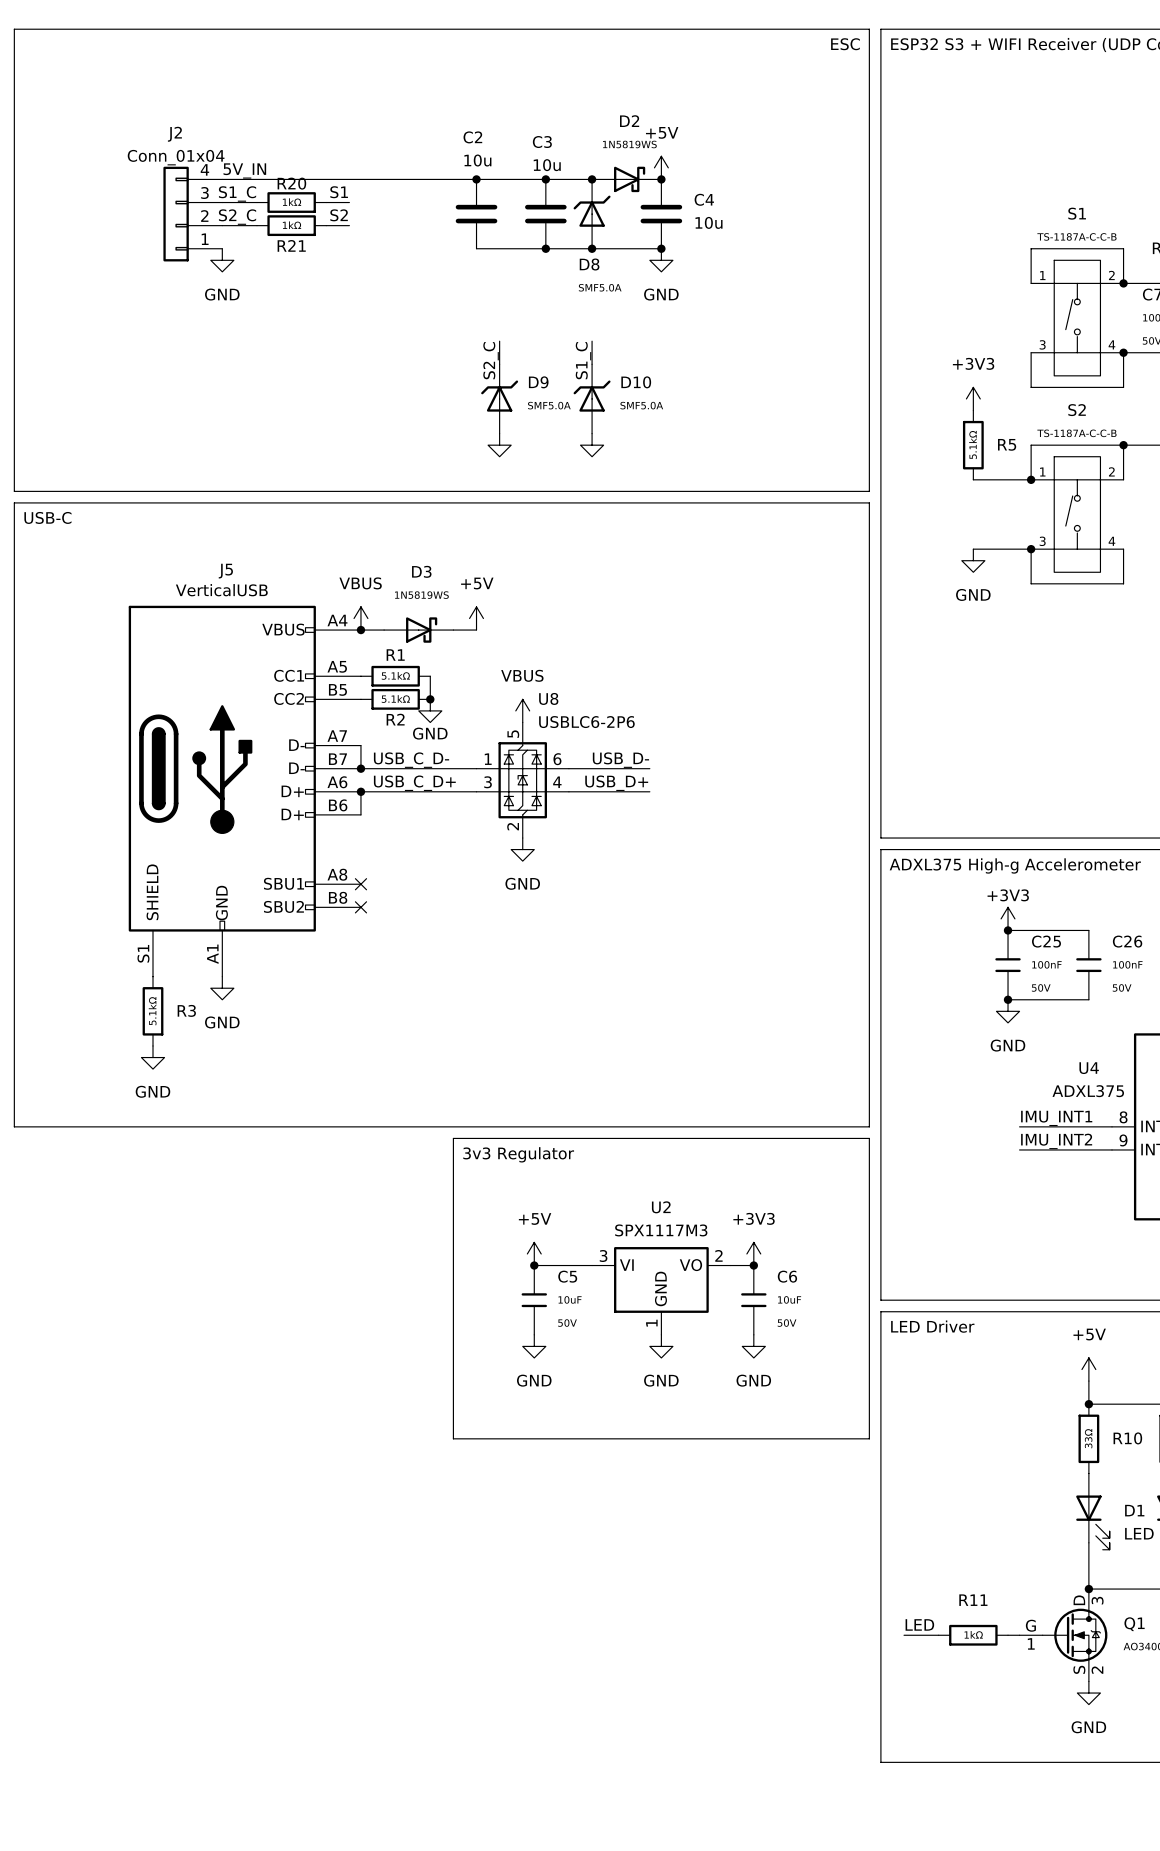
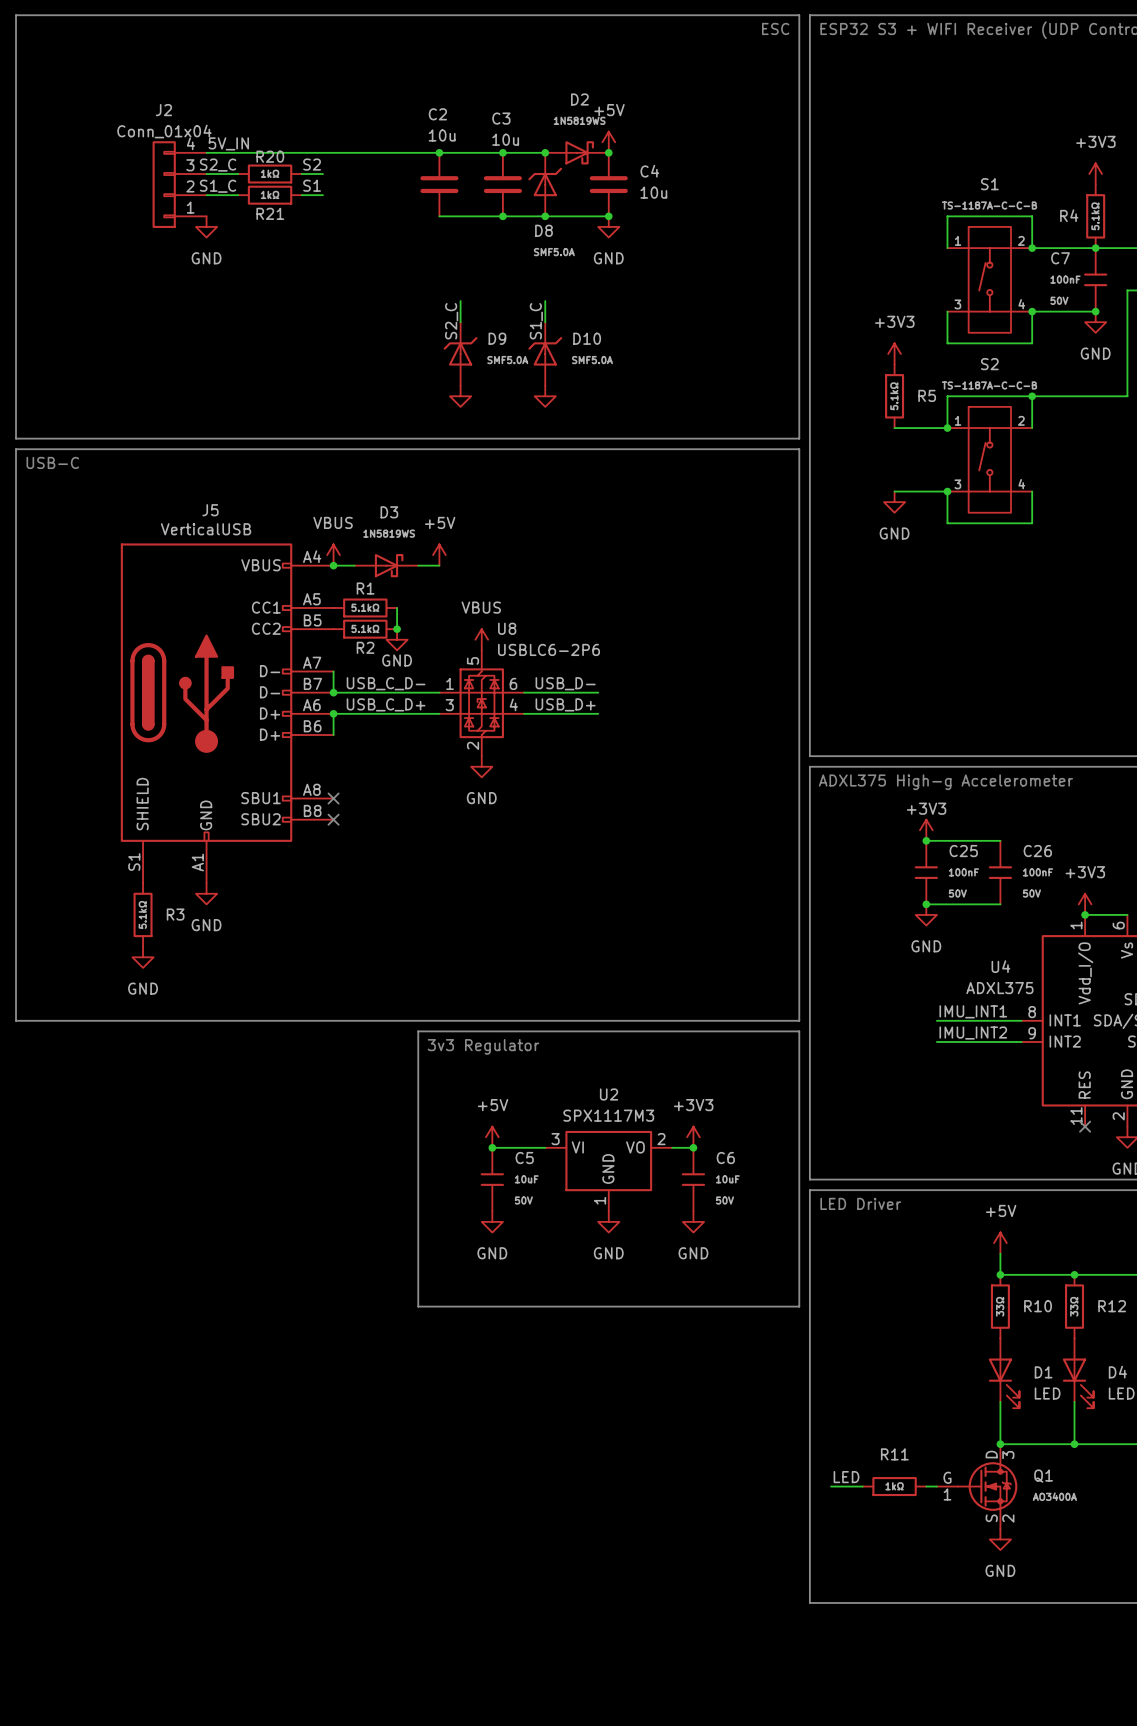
label: S1 (339, 192) -> S2 (312, 164)
label: S1_C (237, 193) -> S2_C (218, 165)
label: S2 (339, 215) -> S1 (312, 185)
label: S2_C (237, 217) -> S1_C (218, 186)

